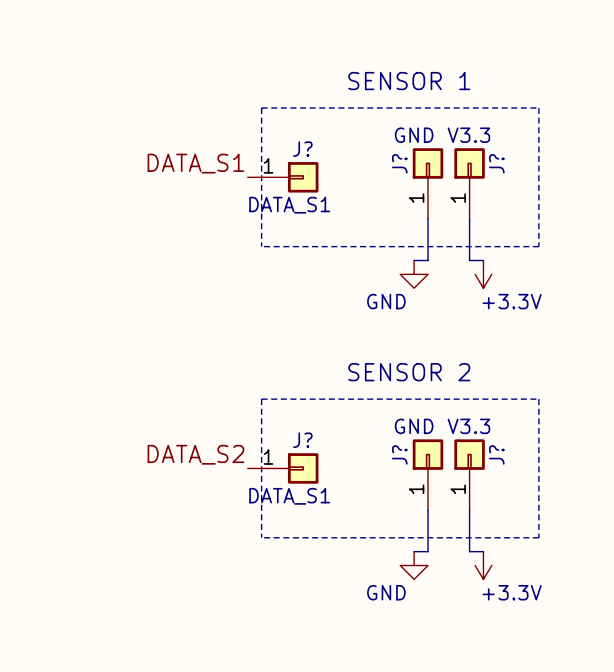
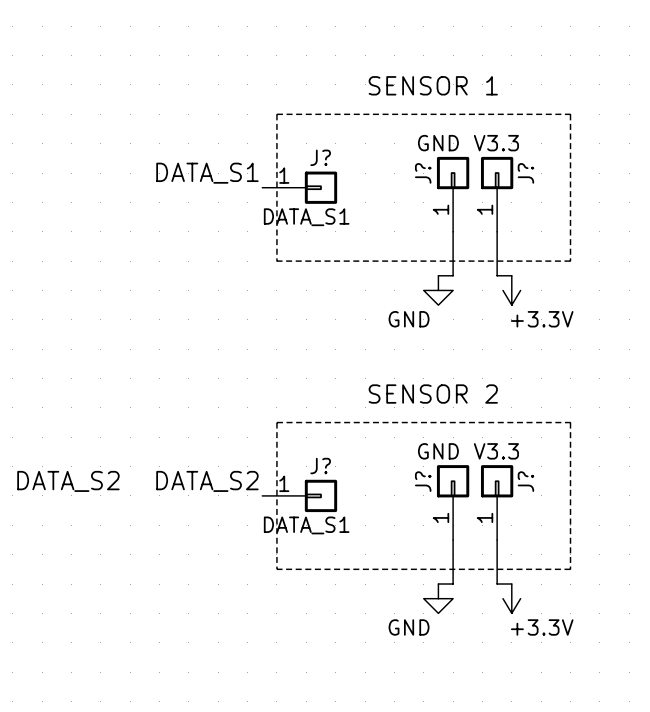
label: none -> DATA_S2 (68, 481)

